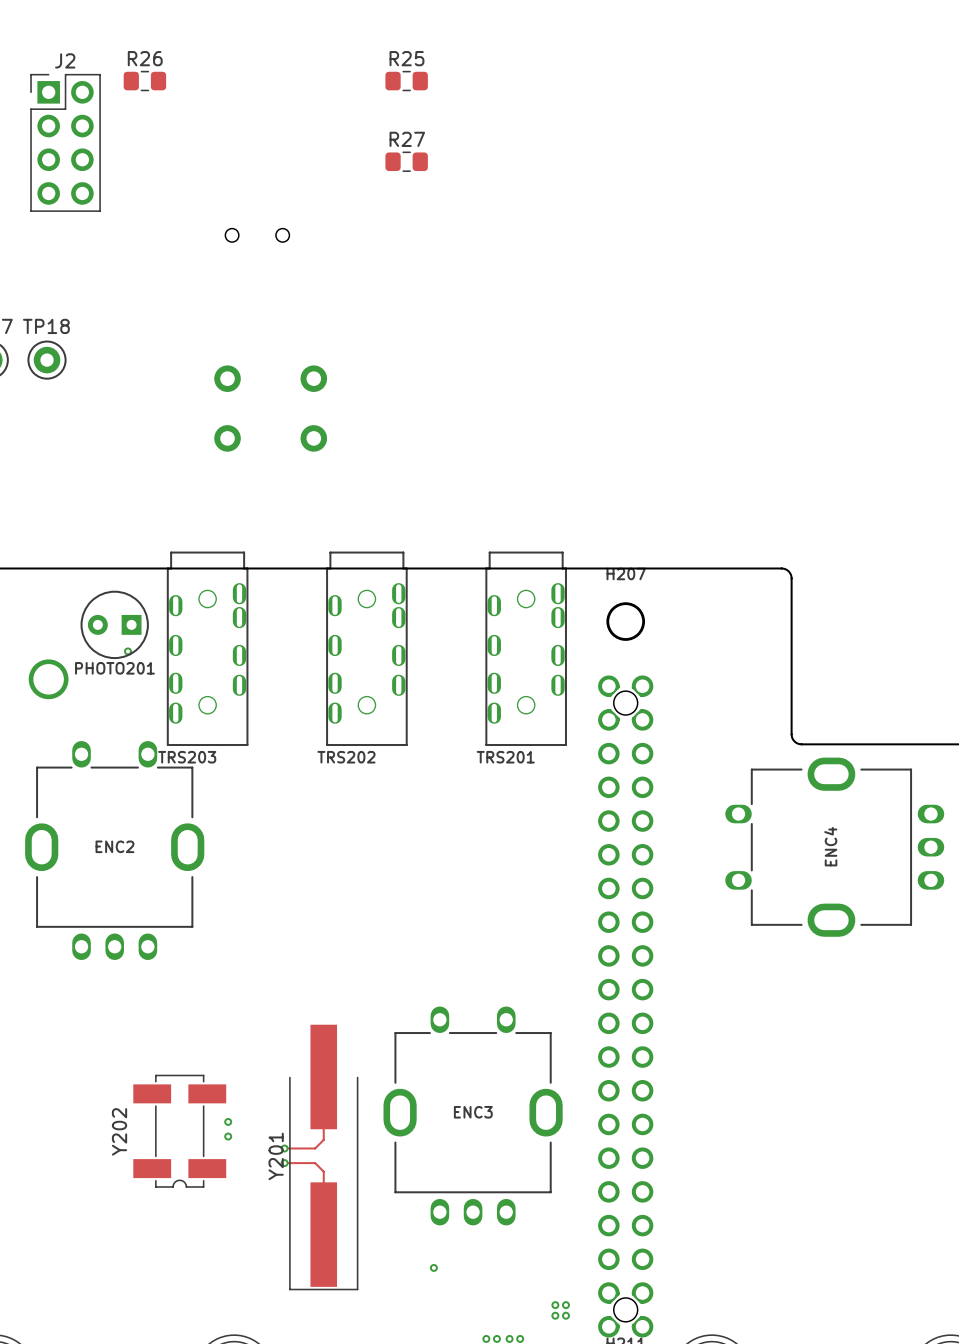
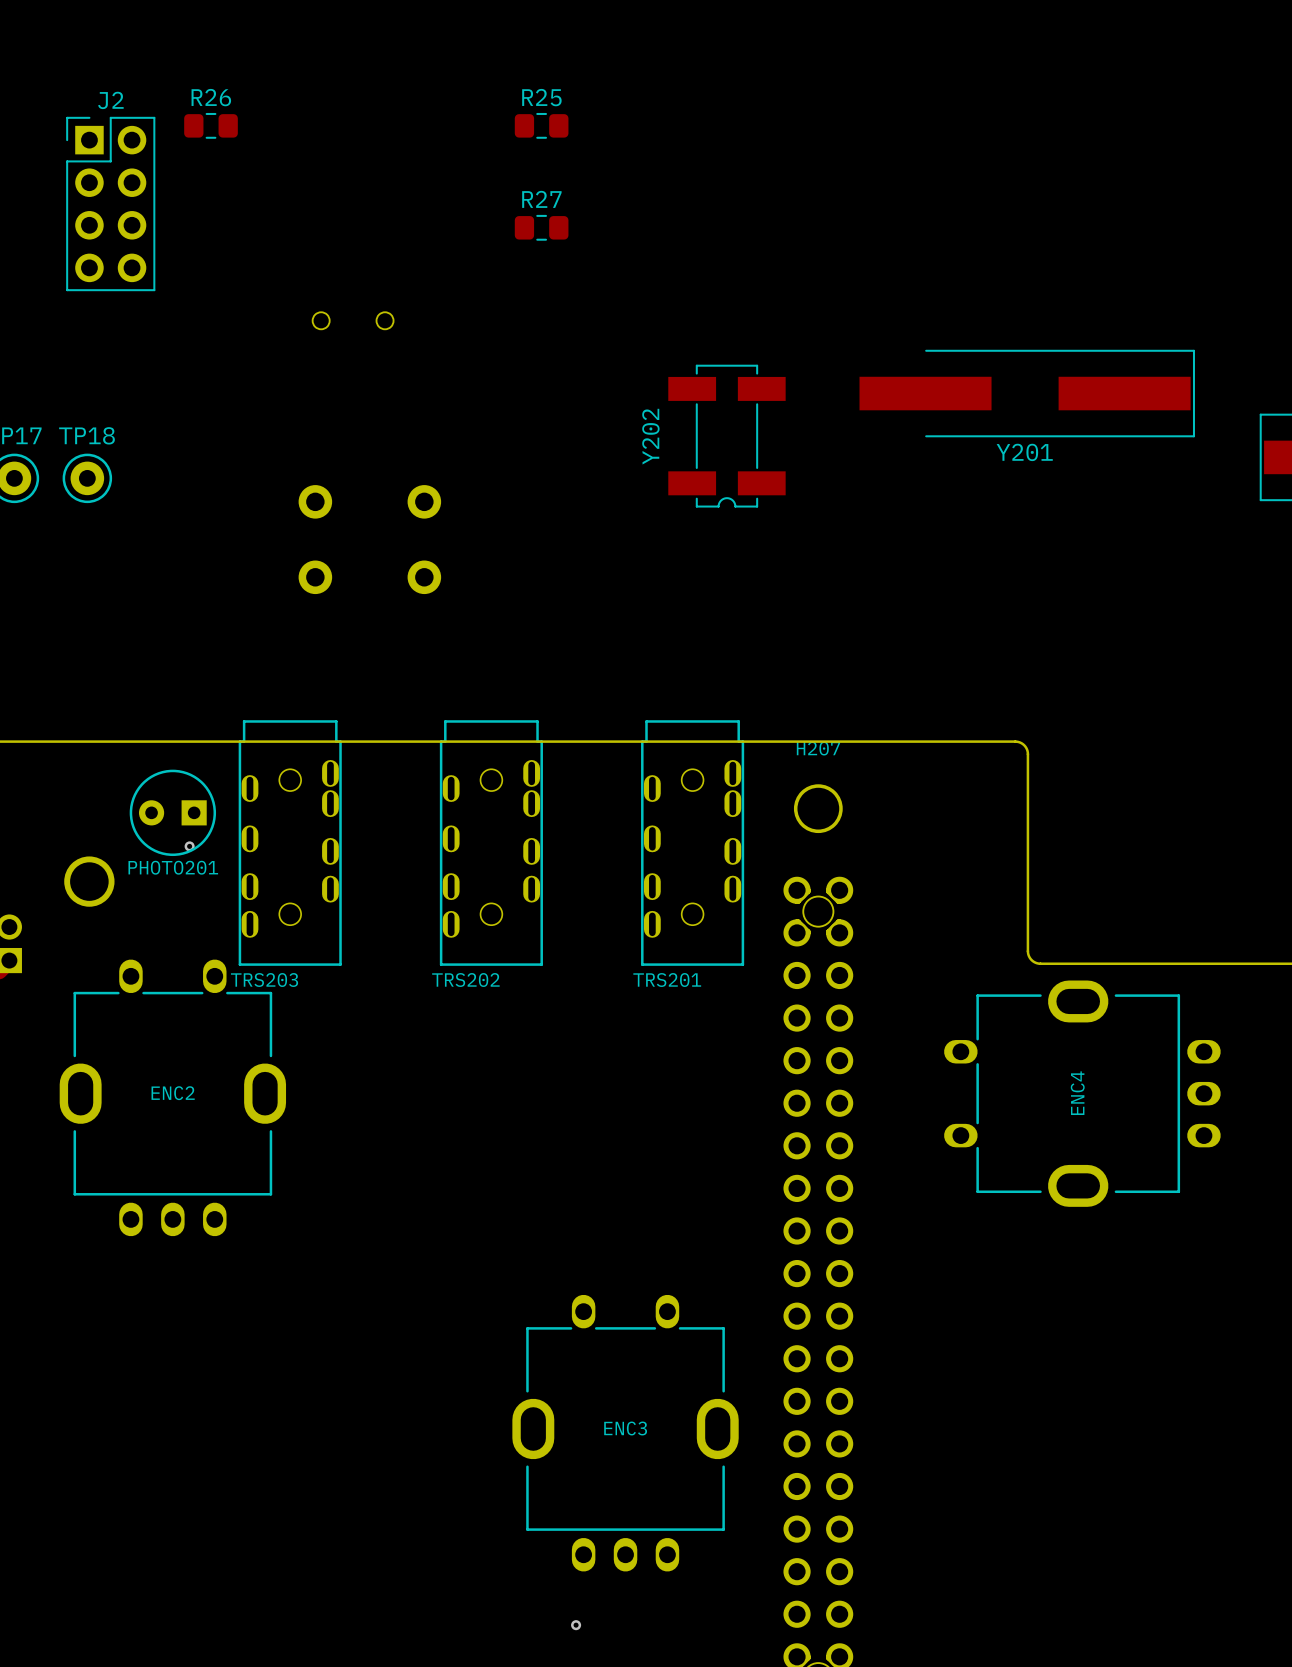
track: (323, 1076) (323, 1139) (315, 1148) (284, 1148) -> none
via: (228, 1121) -> none
Y202 position: (179, 1131) -> (726, 436)
via: (228, 1136) -> none
via: (284, 1148) -> none
Y201 rotation: 0° (323, 1157) -> 90° counterclockwise (1027, 393)
Y201 position: (323, 1157) -> (1027, 393)
track: (284, 1163) (315, 1163) (323, 1171) (323, 1234) -> none
via: (284, 1163) -> none

